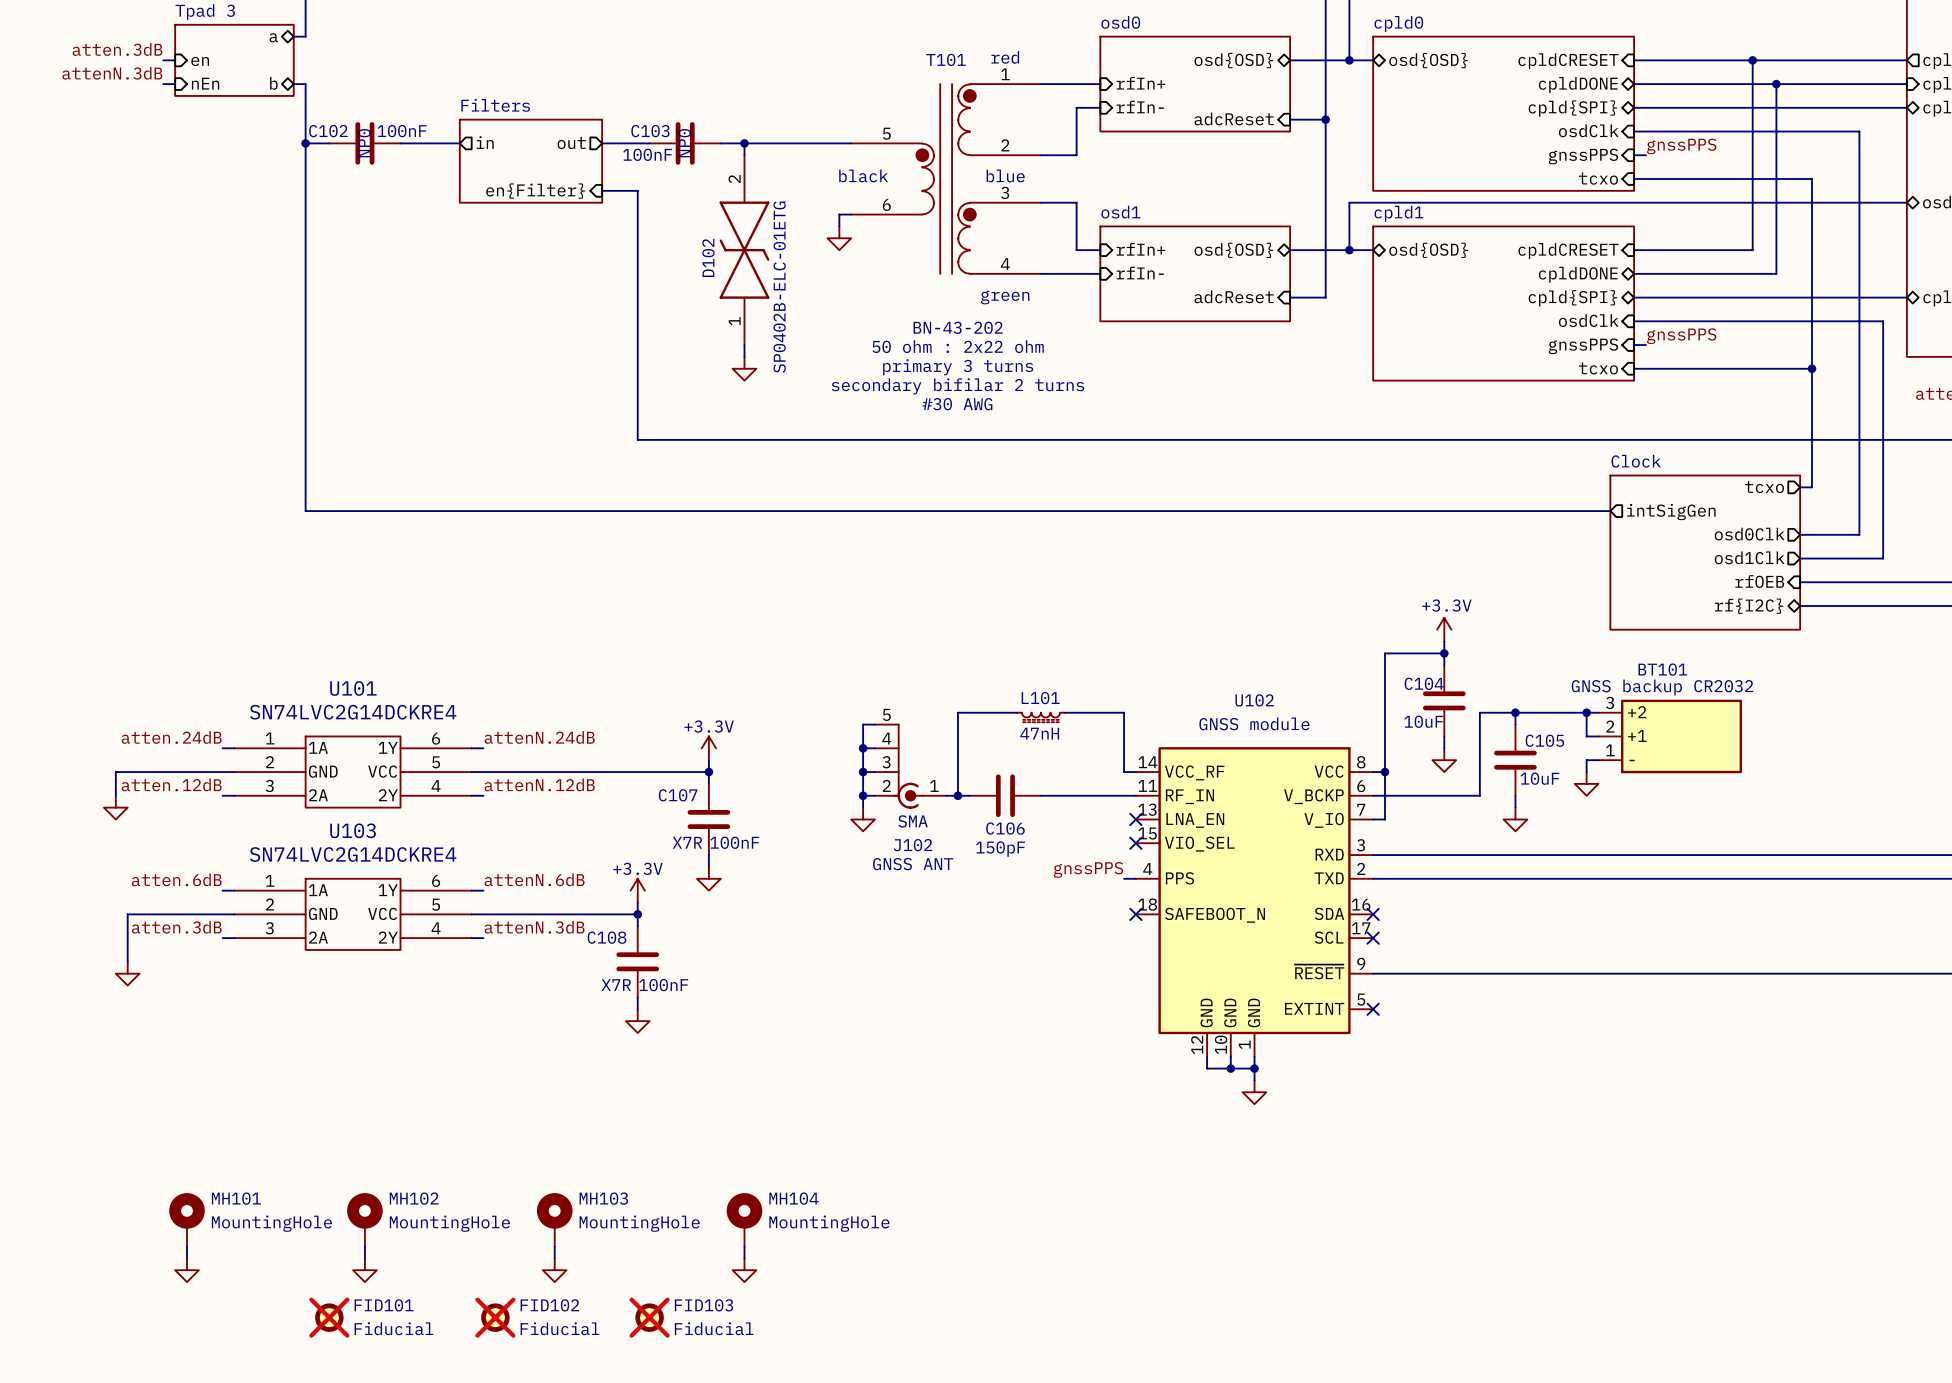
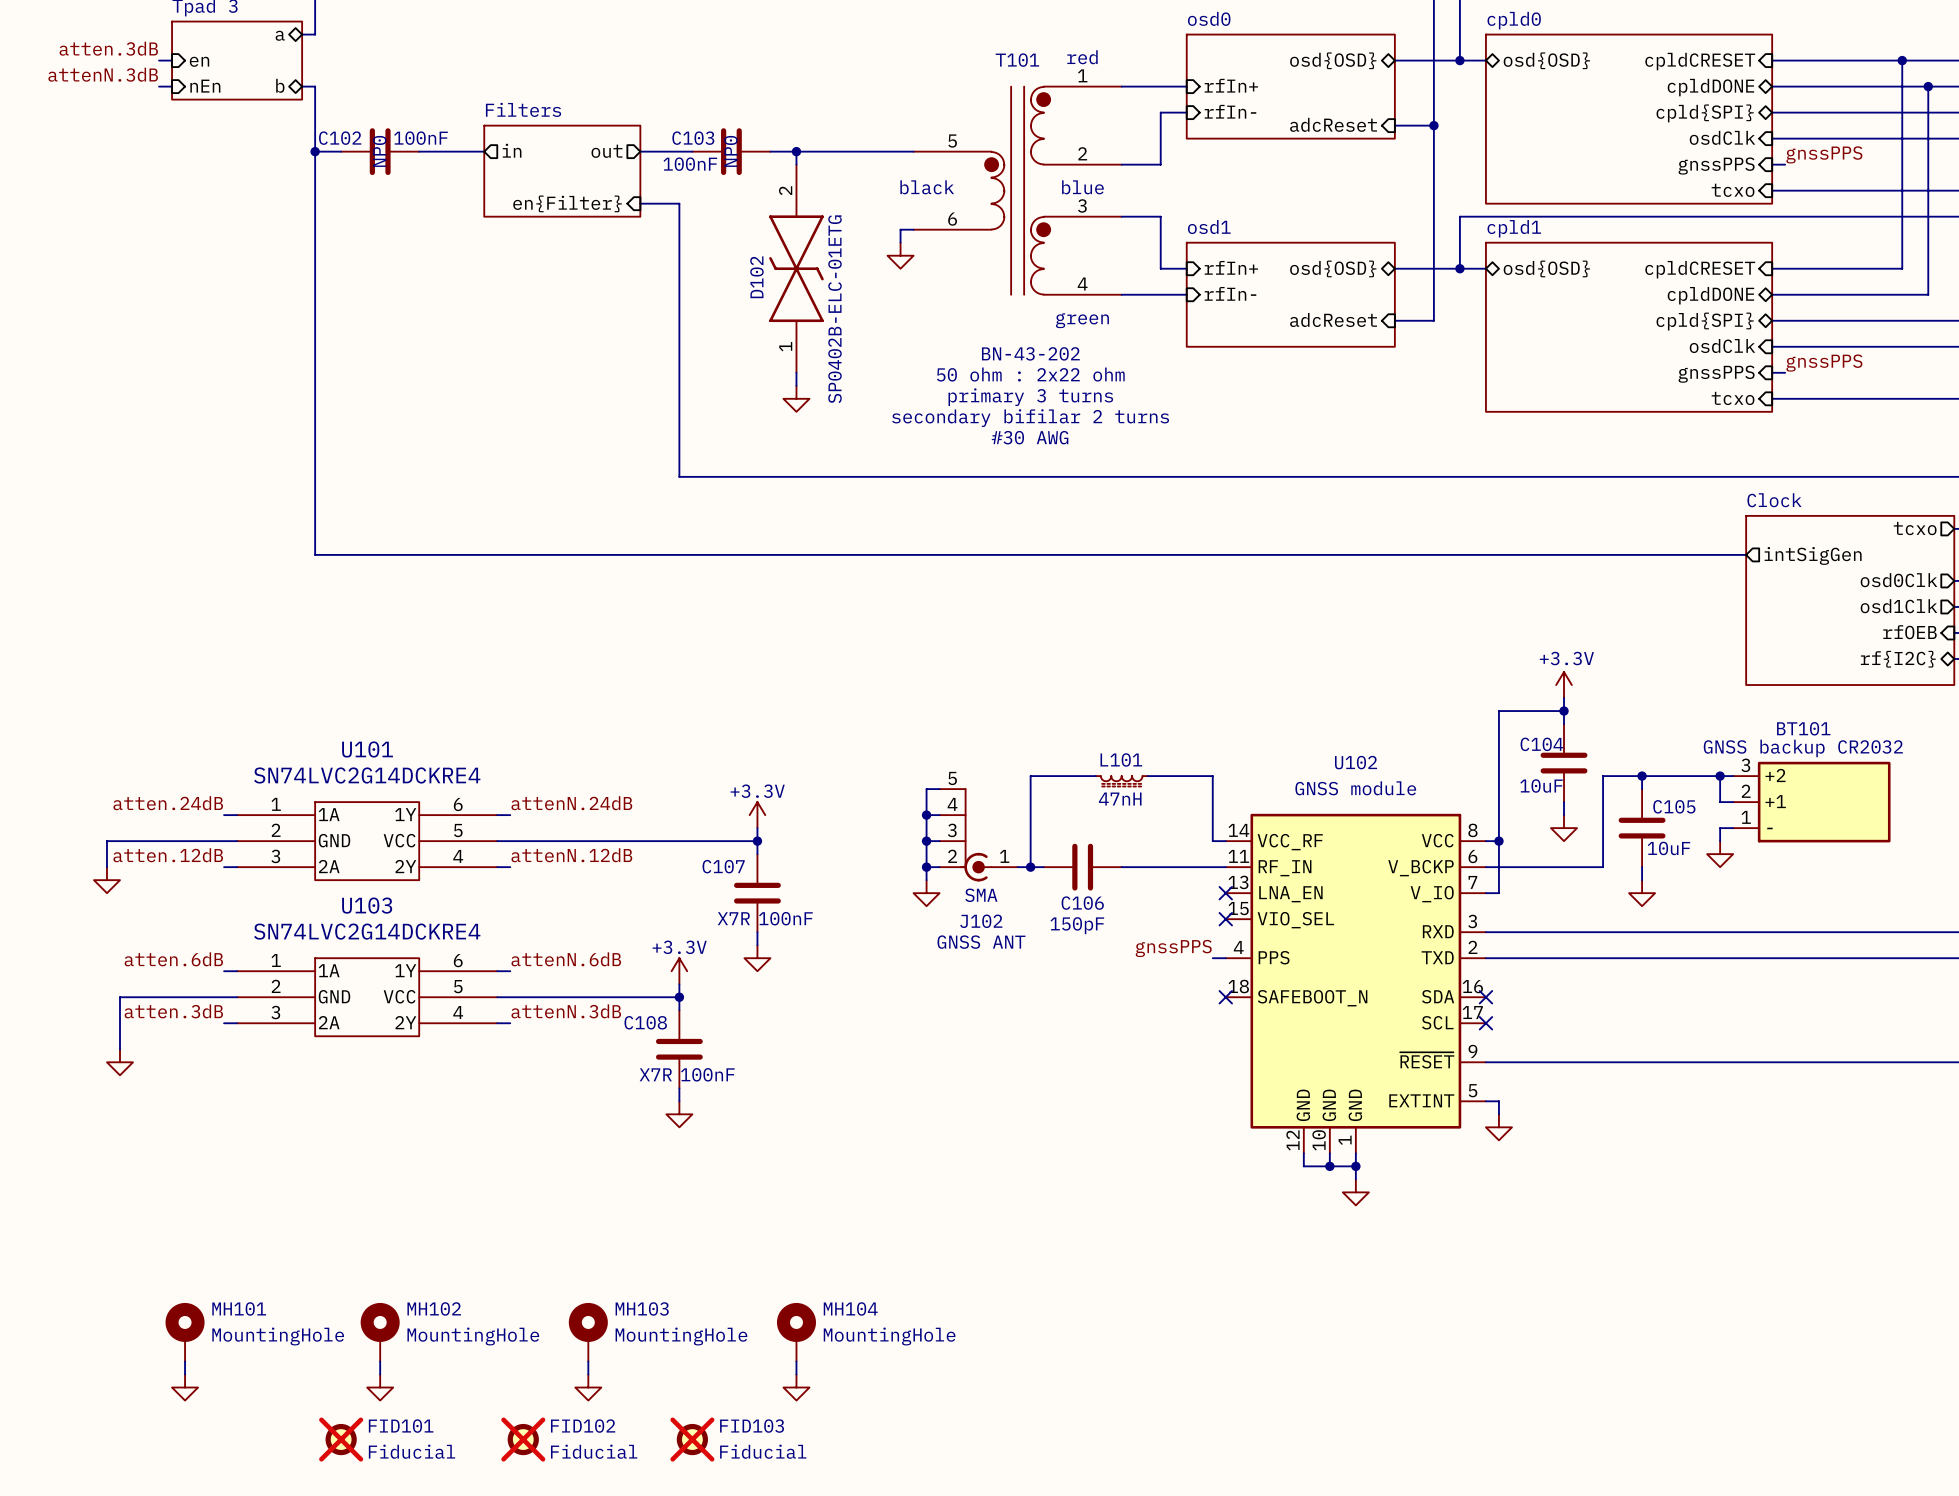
wire: none -> (1485, 1101) (1498, 1101) (1498, 1114)
no-connect mark: (1373, 1009) -> none
power symbol: none -> (1498, 1127)

